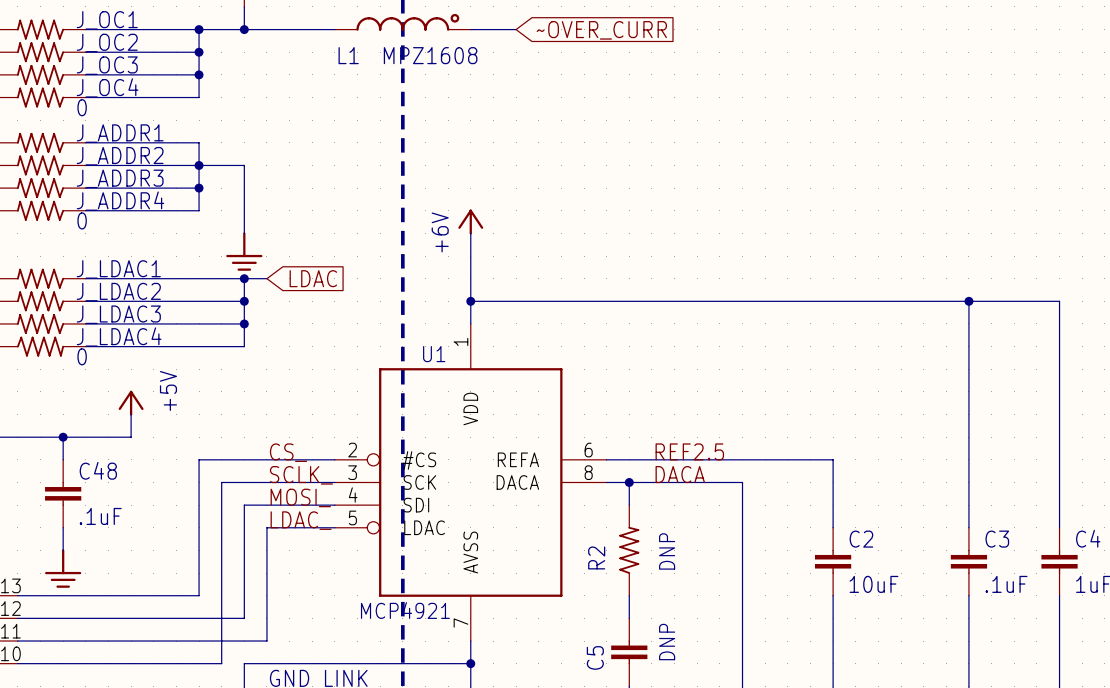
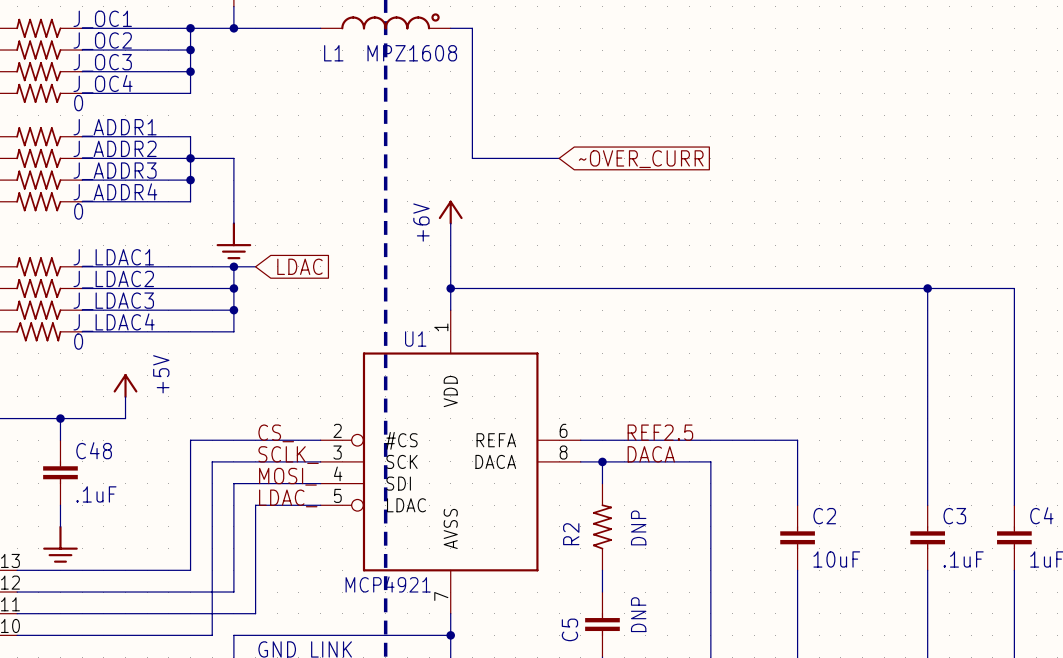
wire: (493, 29) (516, 29) -> (472, 28) (472, 158) (559, 158)
global label position: ~OVER_CURR (601, 30) -> ~OVER_CURR (641, 159)

